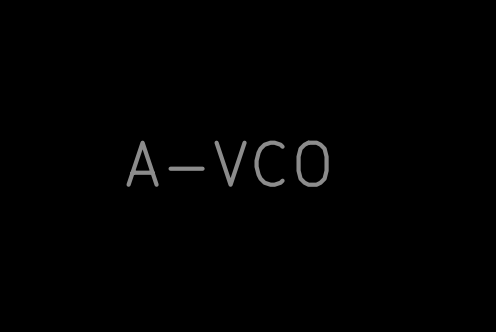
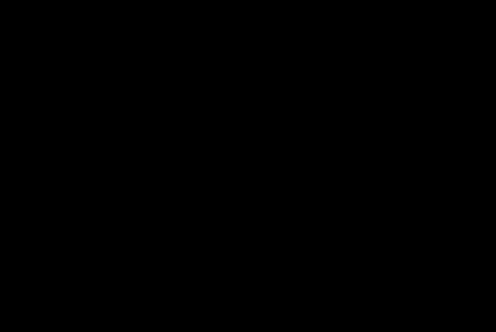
text: A-VCO (227, 163) -> none

